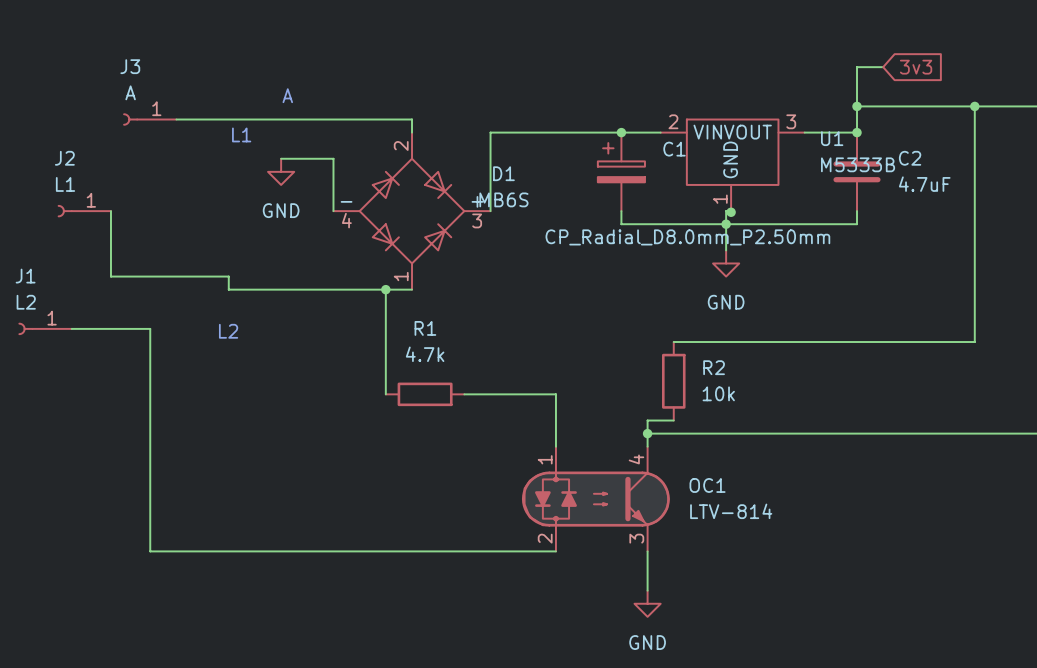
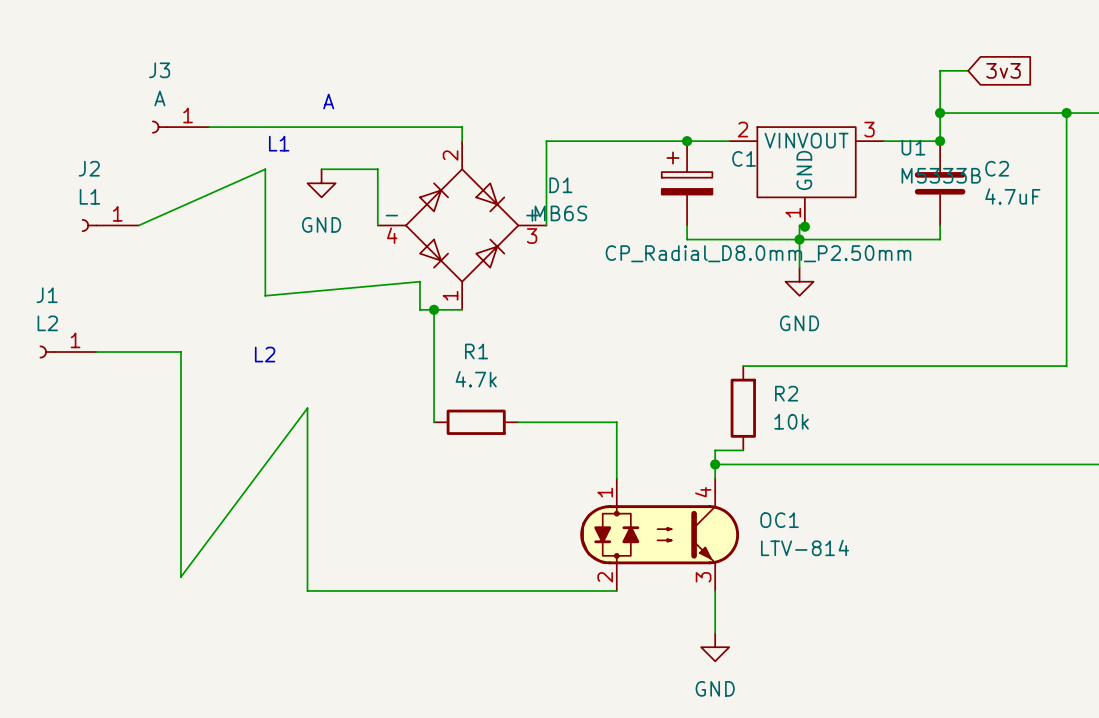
wire: (110, 211) (110, 276) (228, 276) (228, 289) (372, 289) -> (138, 225) (265, 169) (265, 295) (419, 281) (419, 309)
wire: (150, 538) (150, 551) (268, 551) -> (180, 576) (307, 408) (307, 590)

